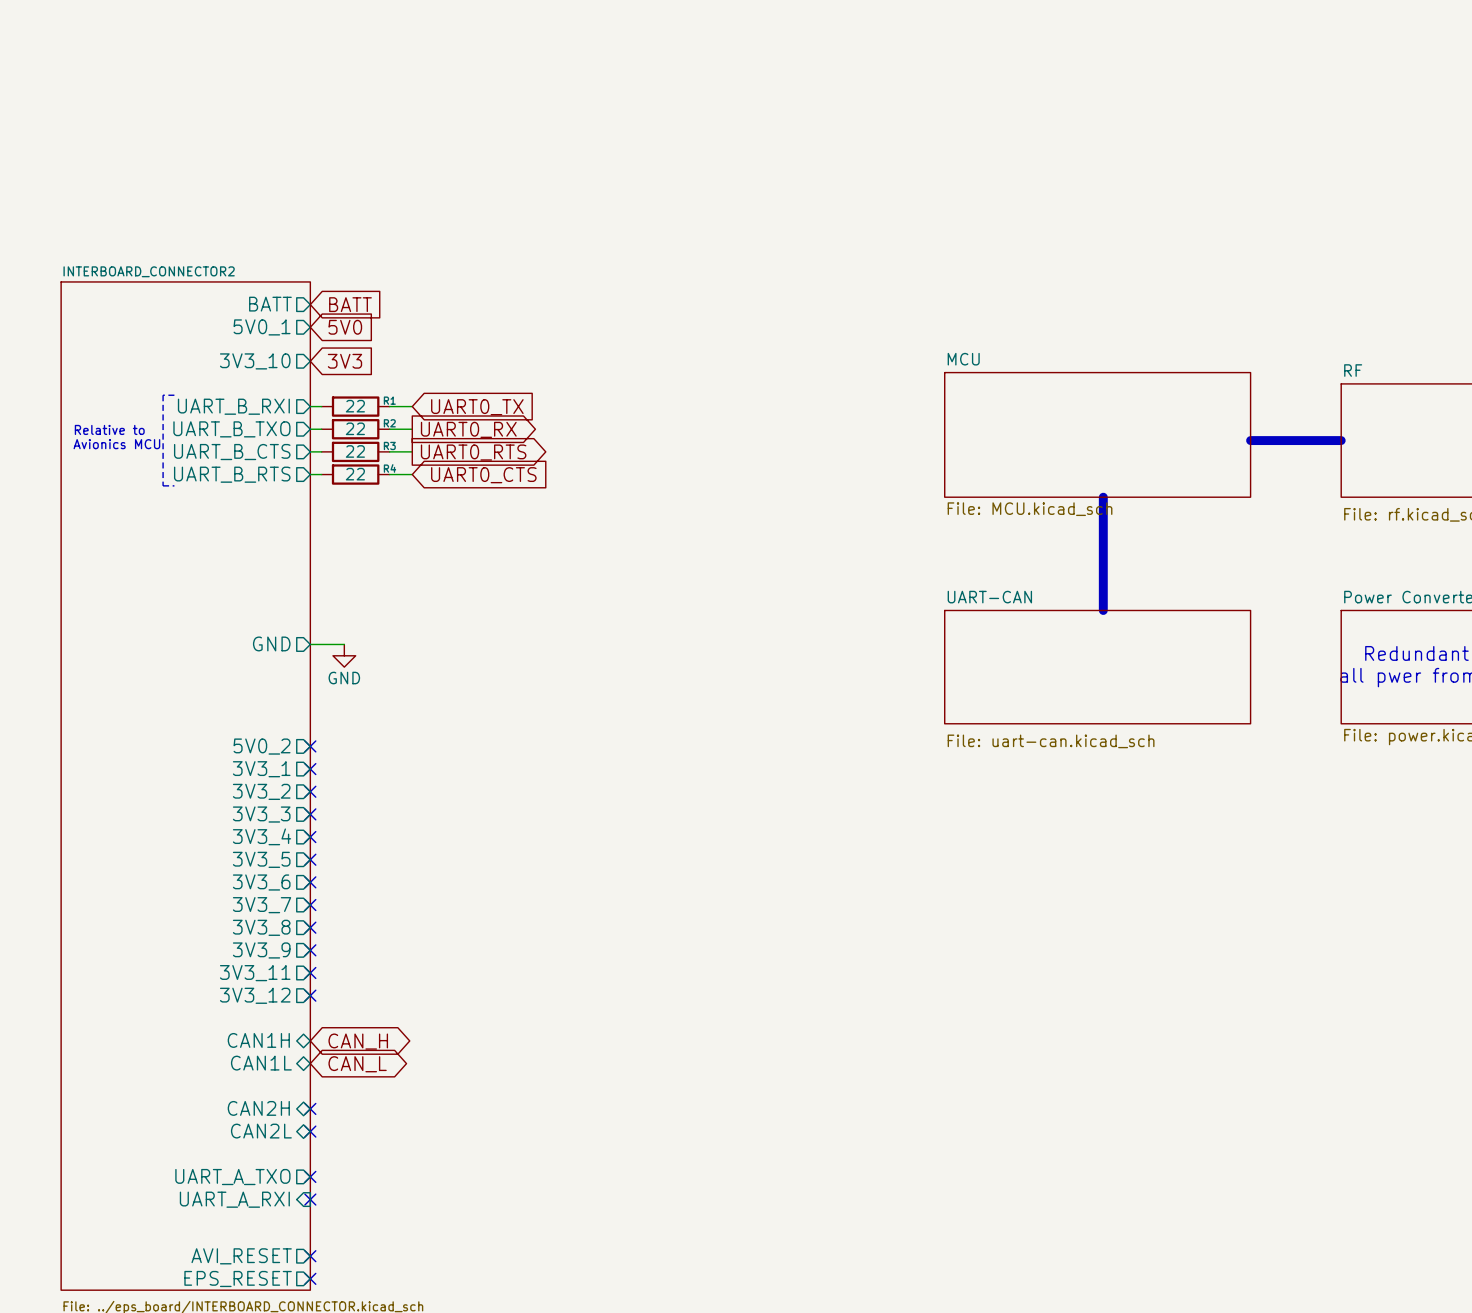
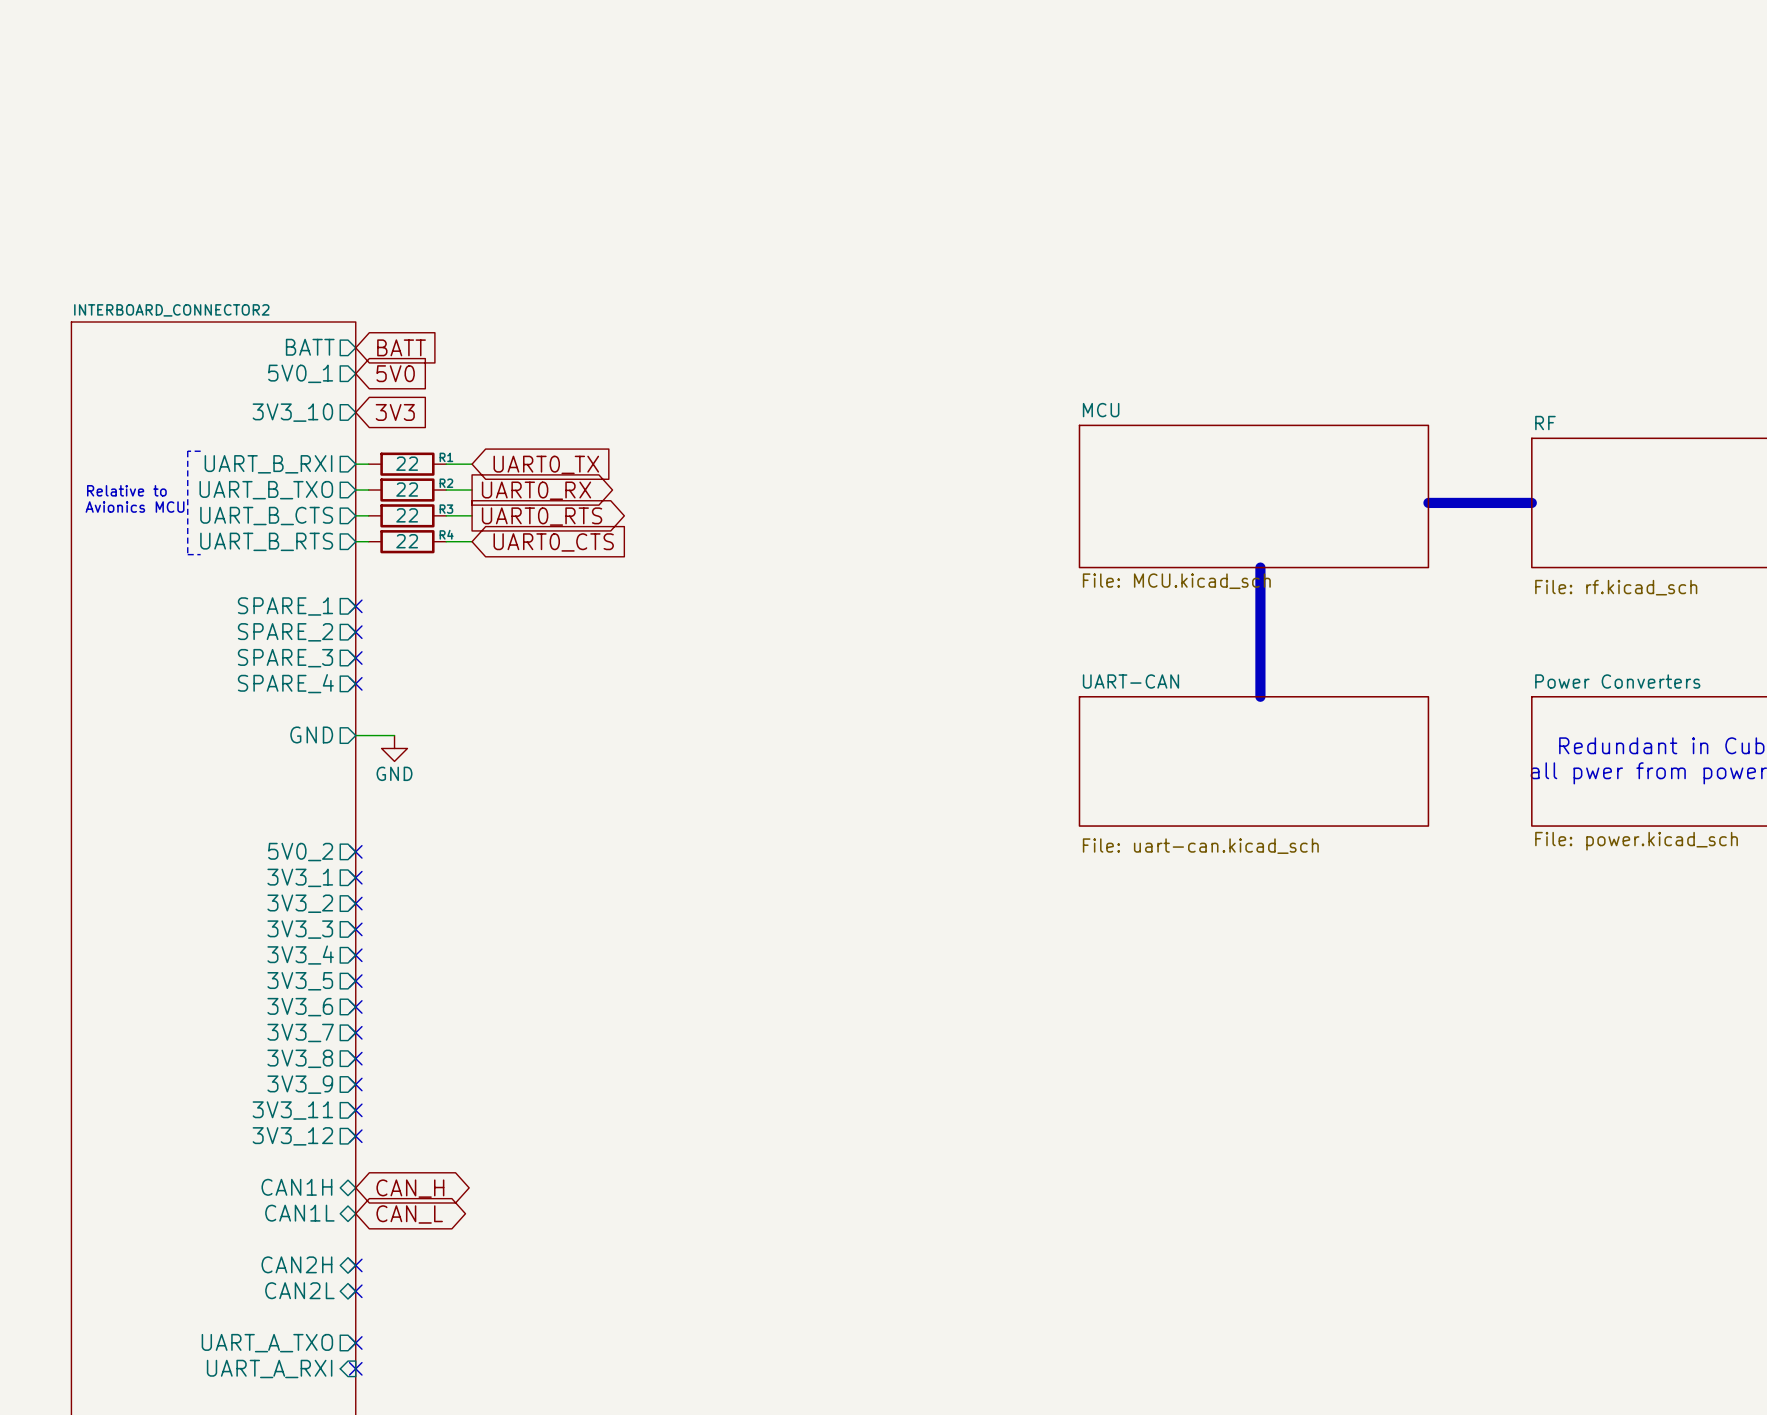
sheet pin: none -> SPARE_1 (285, 606)
no-connect mark: none -> (355, 606)
sheet pin: none -> SPARE_2 (285, 632)
no-connect mark: none -> (355, 632)
sheet pin: none -> SPARE_3 (285, 658)
no-connect mark: none -> (355, 658)
sheet pin: none -> SPARE_4 (285, 683)
no-connect mark: none -> (355, 683)

